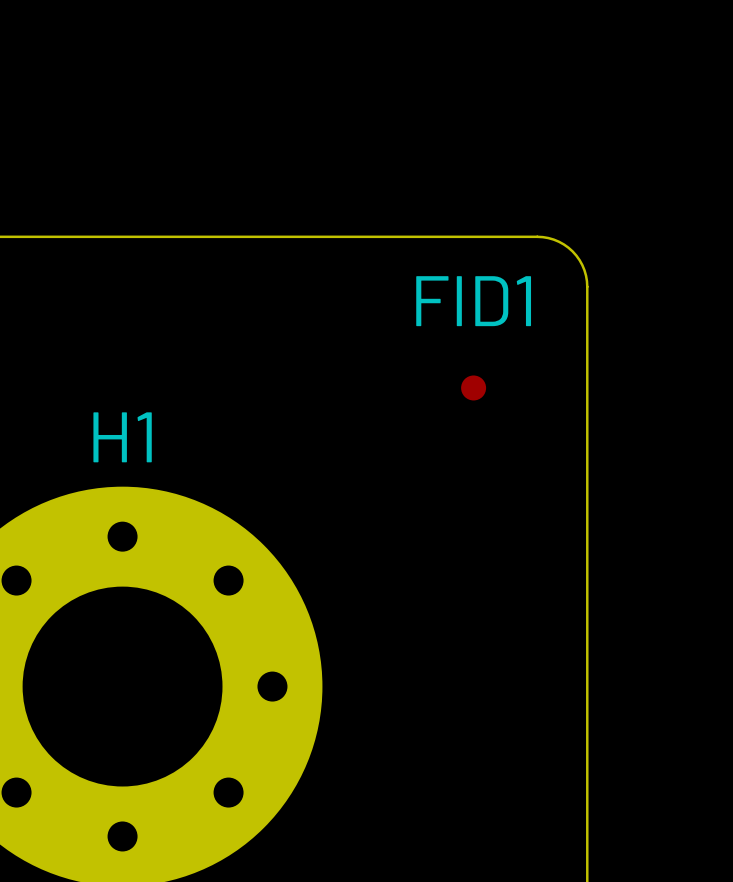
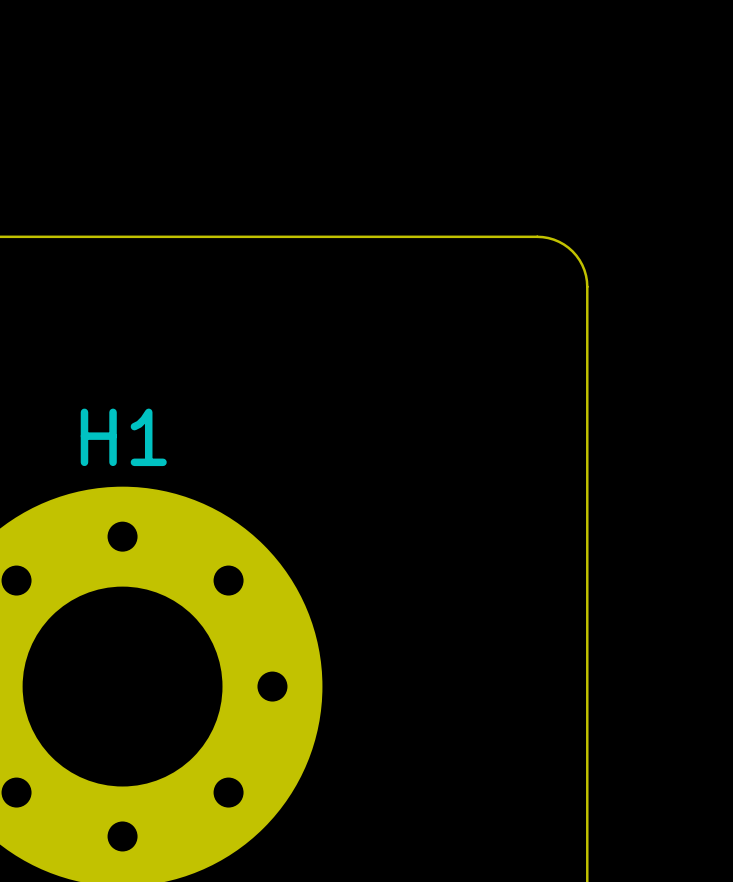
FID1: (473, 387) -> none

